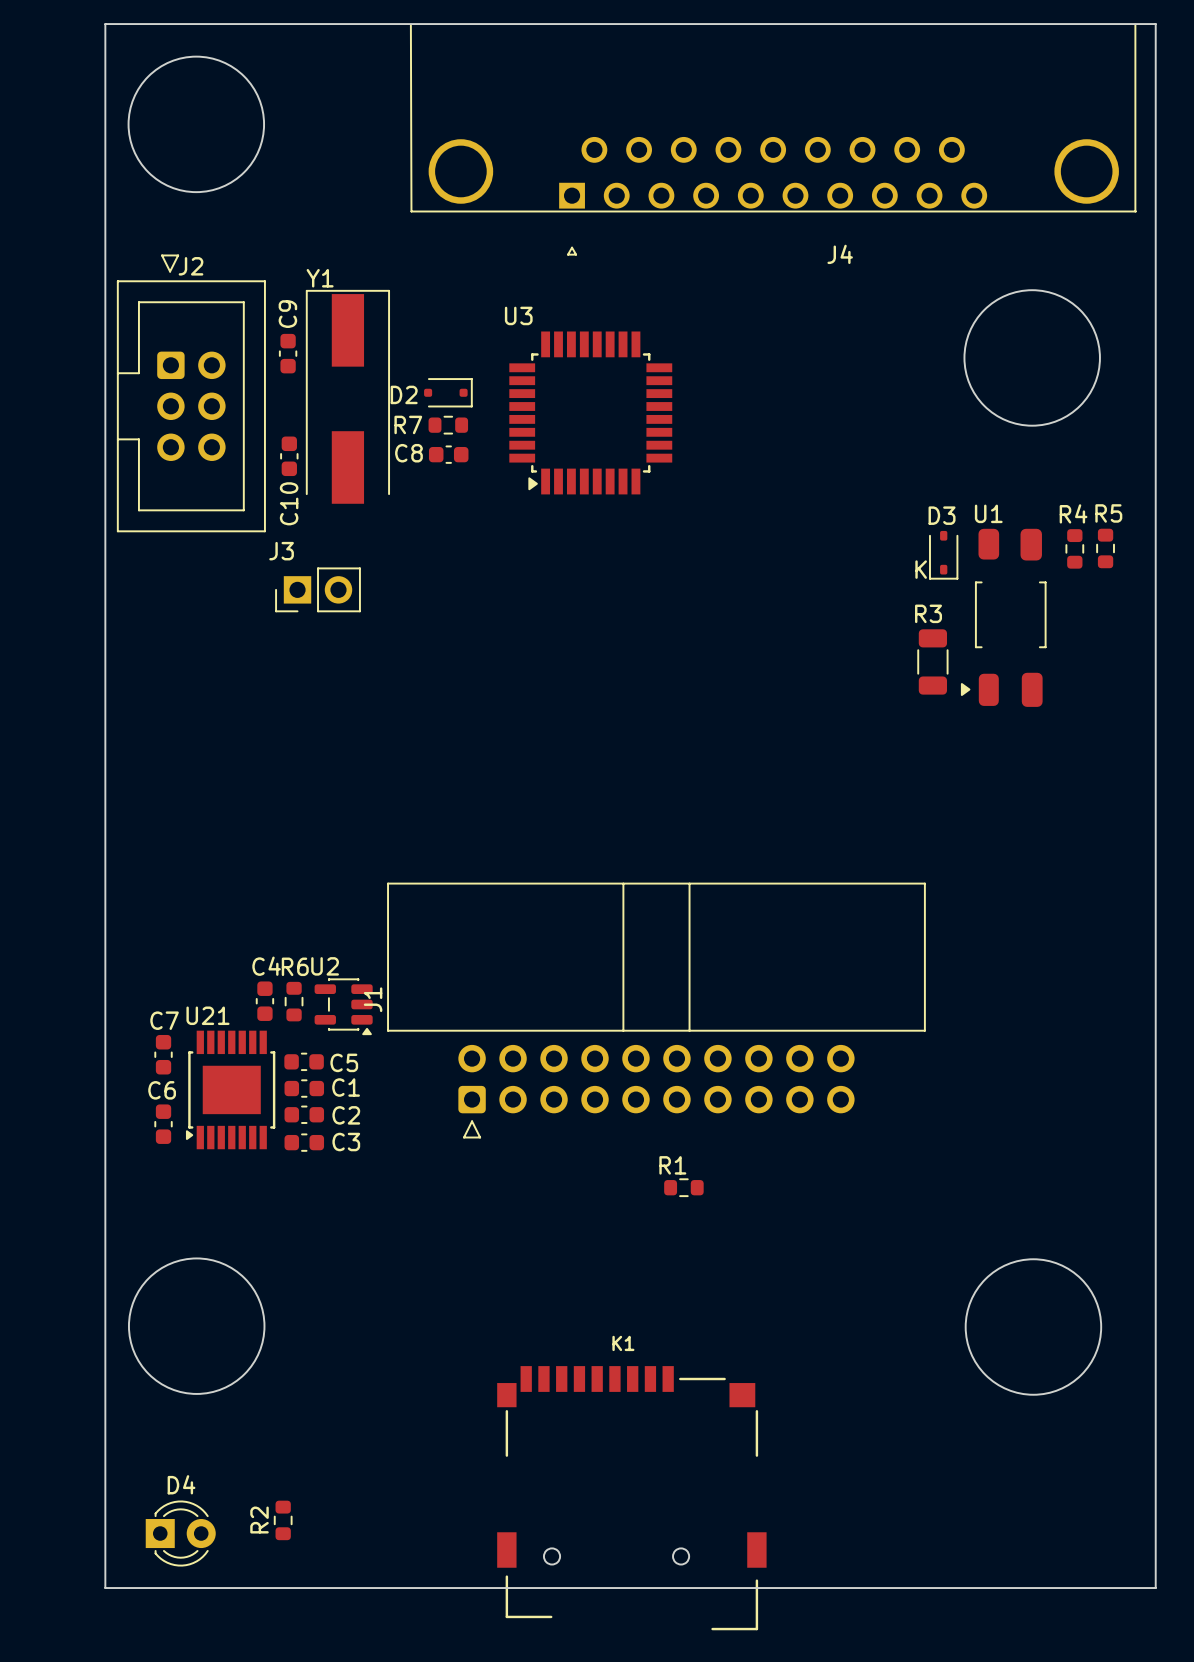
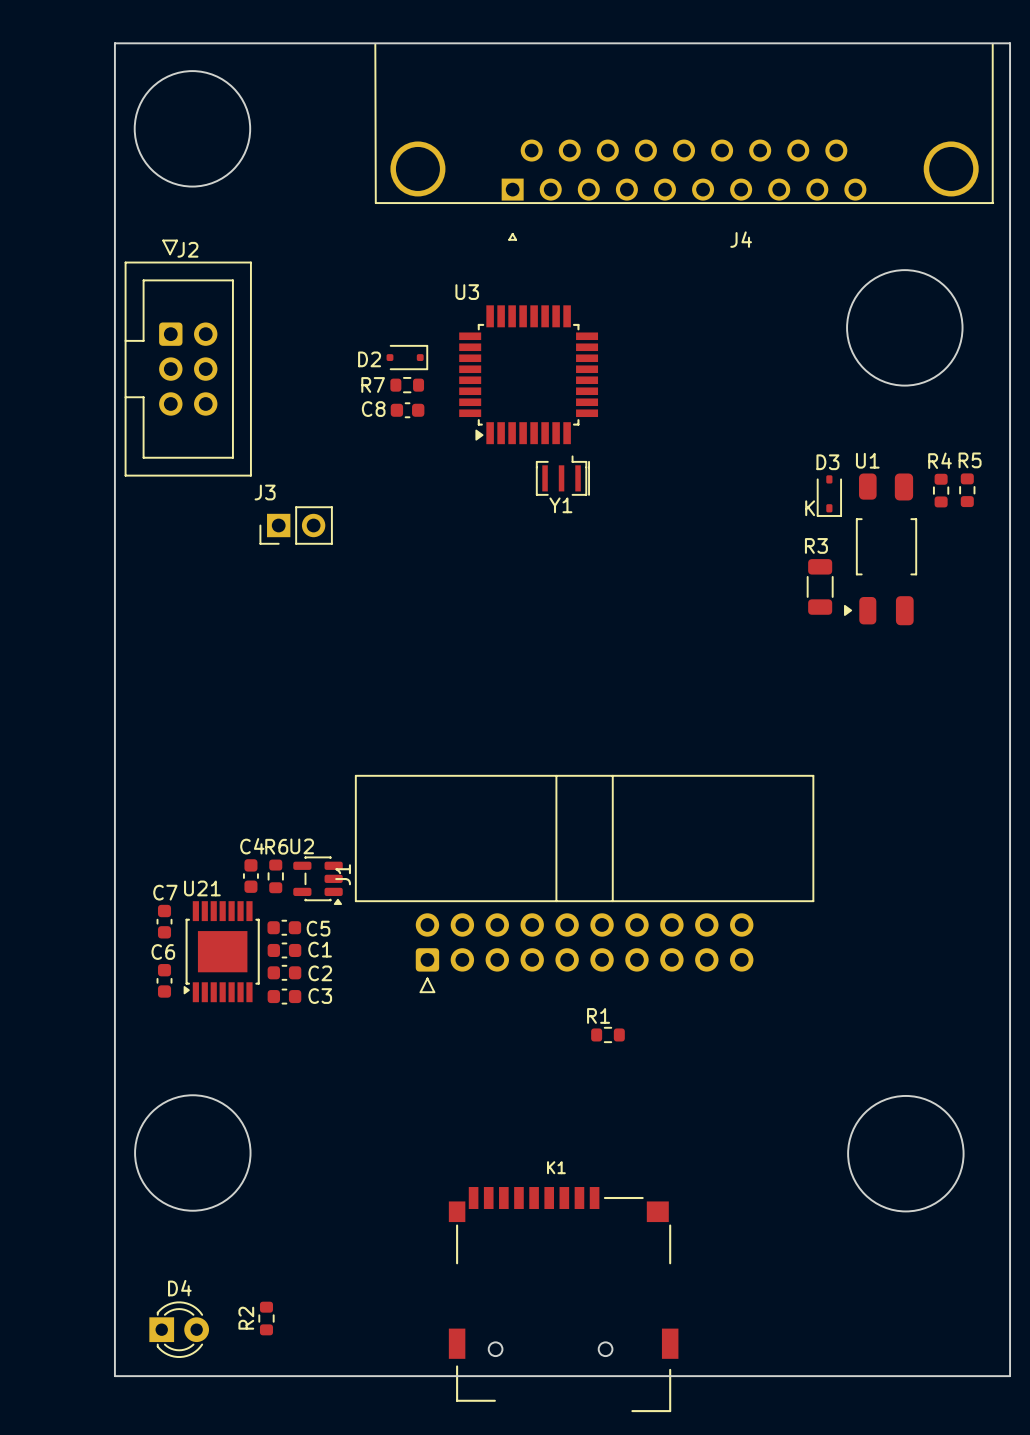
Y1 name position: Y1 (320, 278) -> Y1 (560, 505)
Y1 footprint: [305, 289, 391, 504] -> [535, 455, 590, 496]
C9: (288, 353) -> none
C10: (289, 456) -> none

